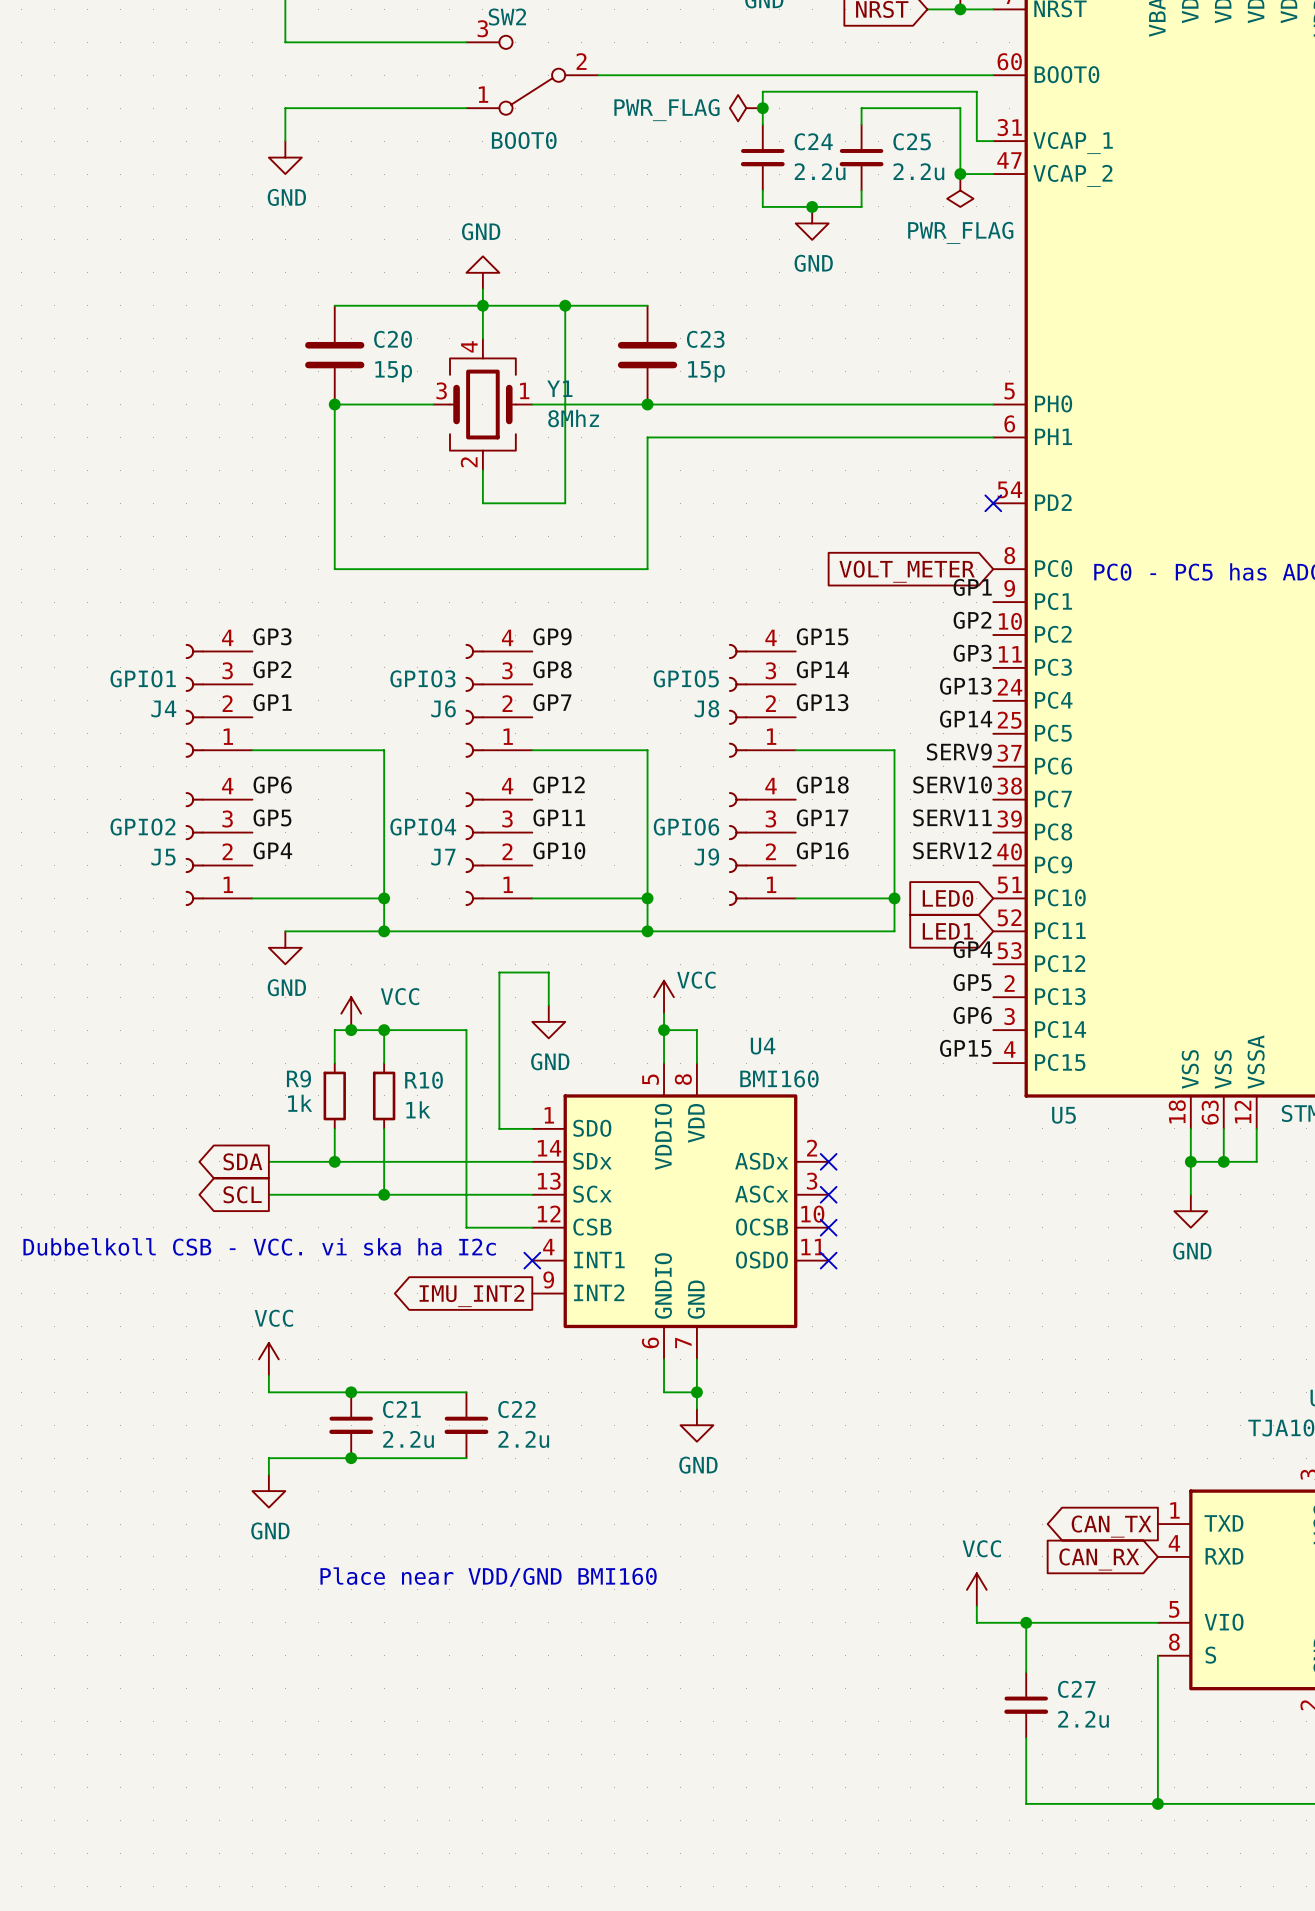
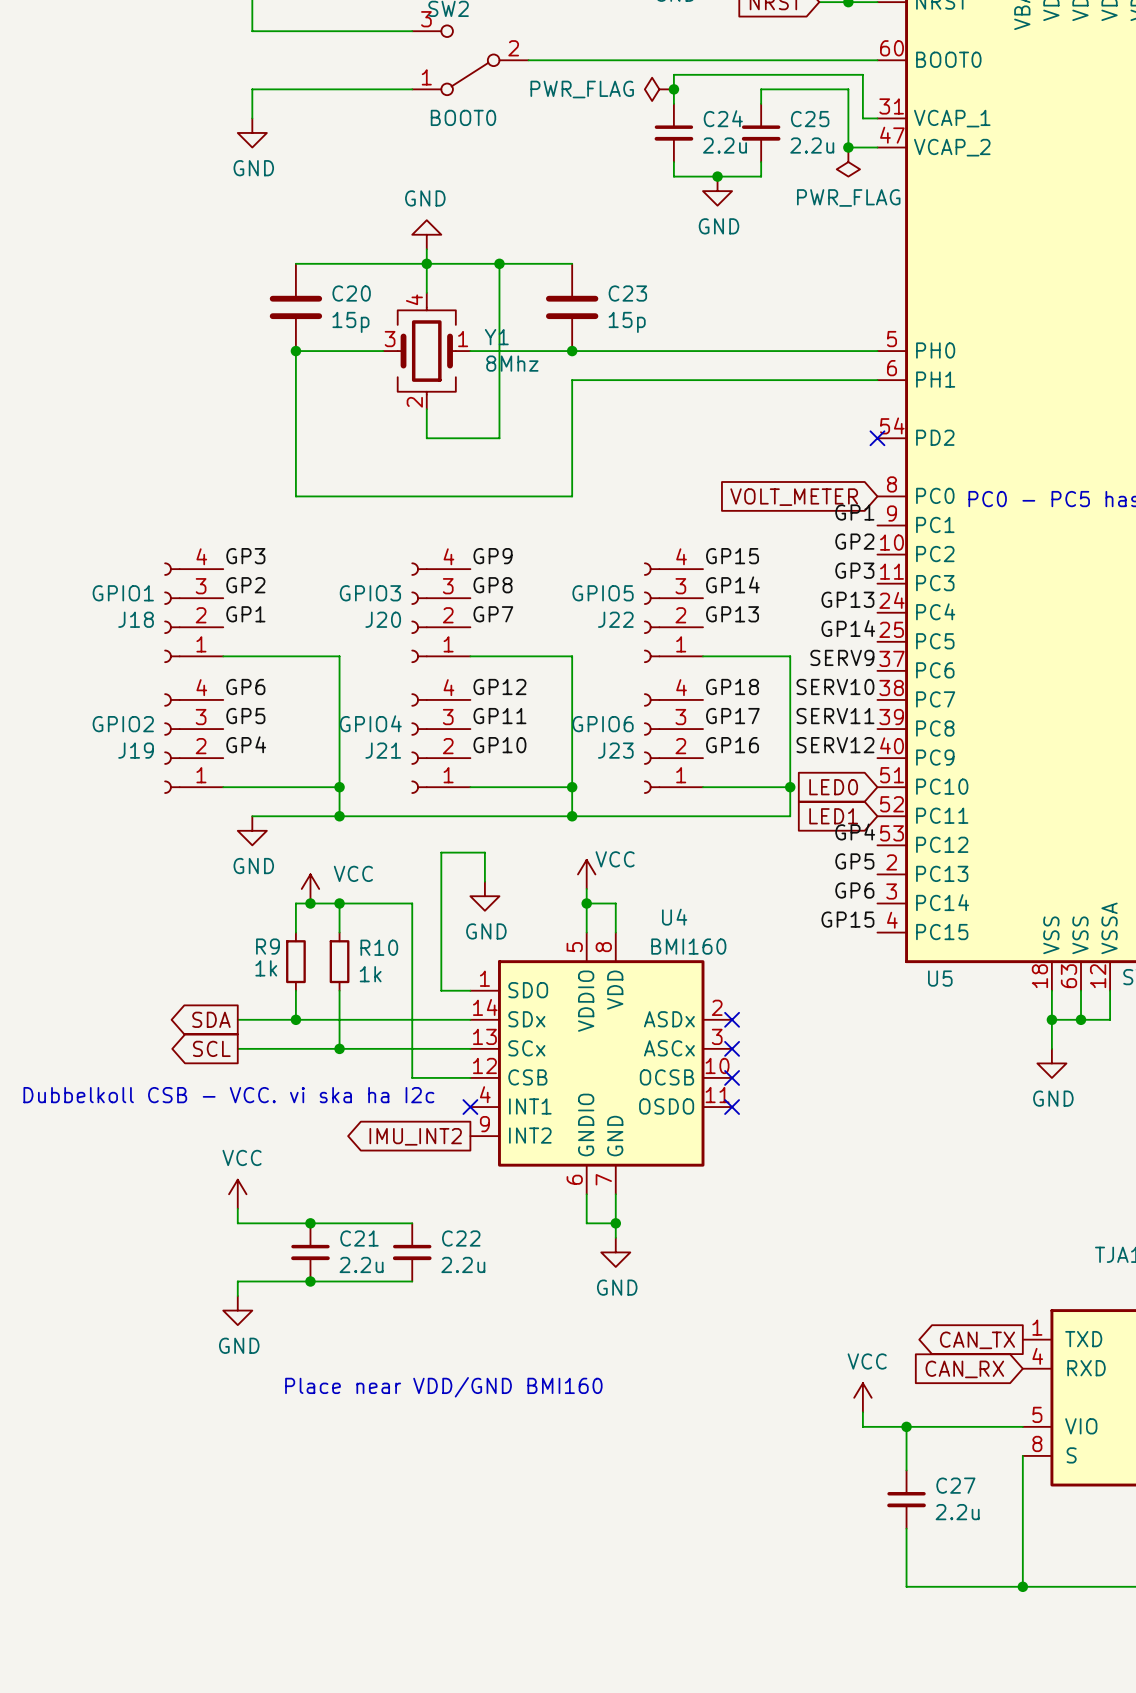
J4 name: J4 (163, 708) -> J18 (136, 619)
J6 name: J6 (443, 708) -> J20 (383, 619)
J8 name: J8 (706, 708) -> J22 (615, 619)
J9 name: J9 (706, 856) -> J23 (615, 750)
J5 name: J5 (163, 857) -> J19 (136, 750)
J7 name: J7 (443, 857) -> J21 (383, 750)

